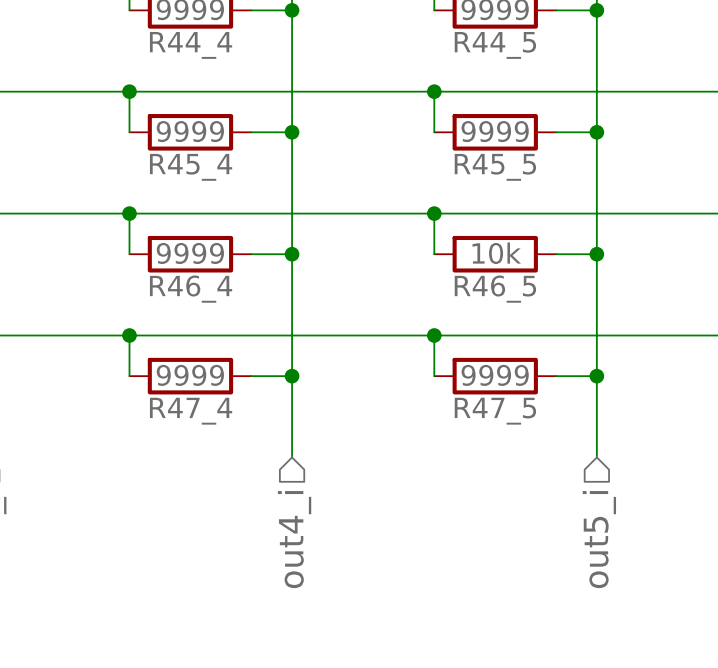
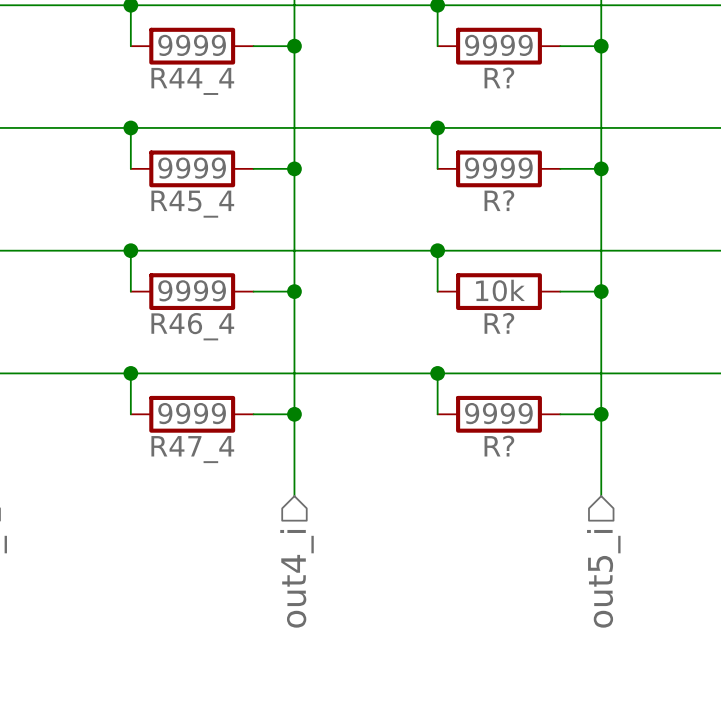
R44_5 name: R44_5 (495, 45) -> R? (499, 77)
R45_5 name: R45_5 (495, 167) -> R? (499, 200)
R46_5 name: R46_5 (495, 289) -> R? (499, 323)
R47_5 name: R47_5 (495, 411) -> R? (499, 446)

